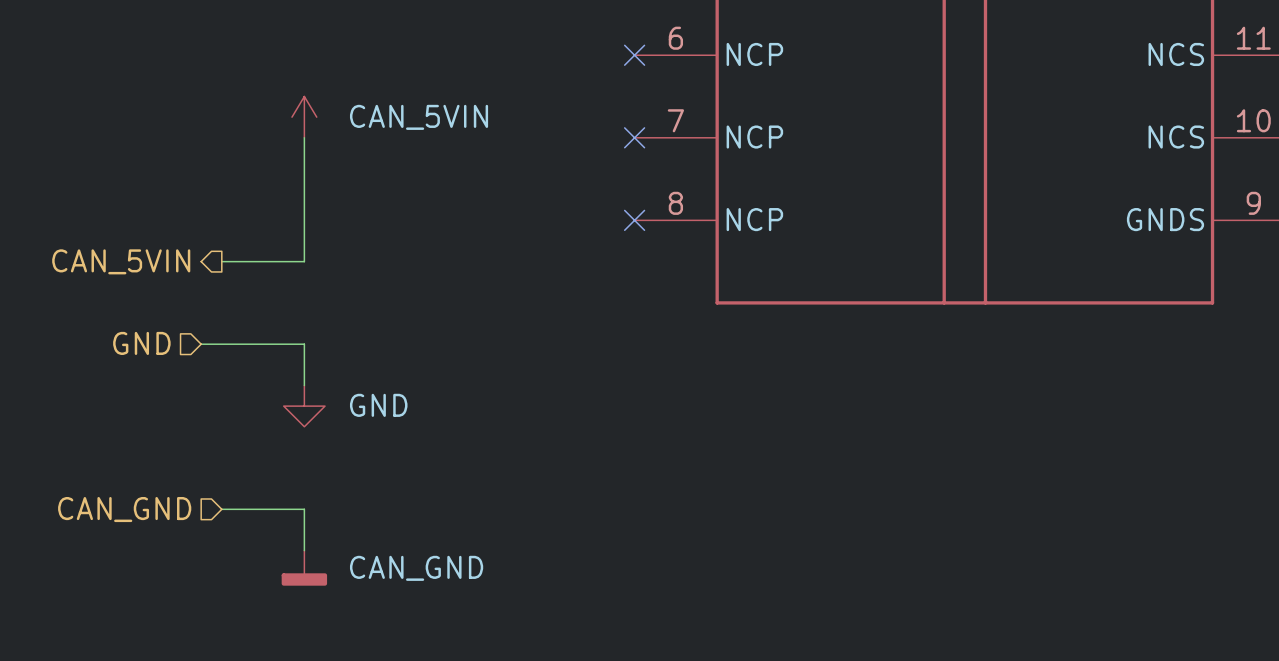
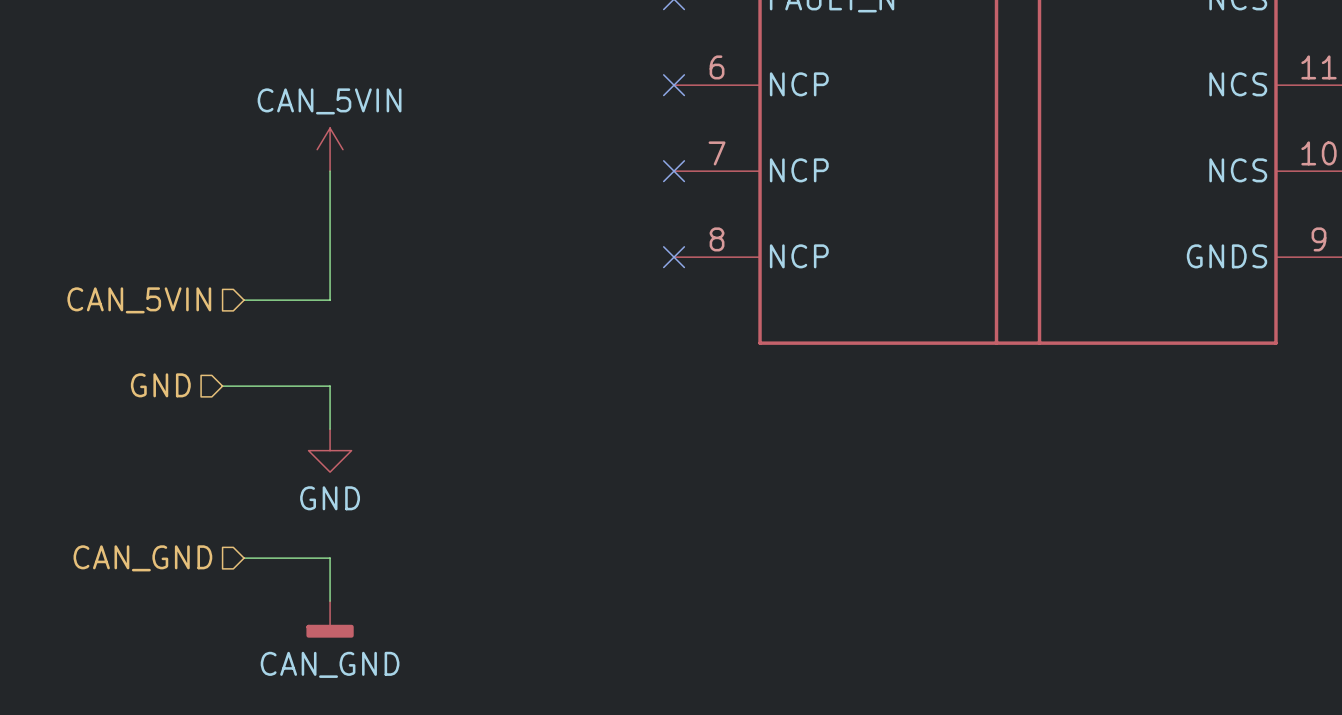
power symbol text position: CAN_5VIN (419, 117) -> CAN_5VIN (329, 101)
hierarchical label shape: output (121, 261) -> input (139, 300)
power symbol text position: GND (378, 405) -> GND (330, 498)
power symbol text position: CAN_GND (416, 568) -> CAN_GND (330, 664)

